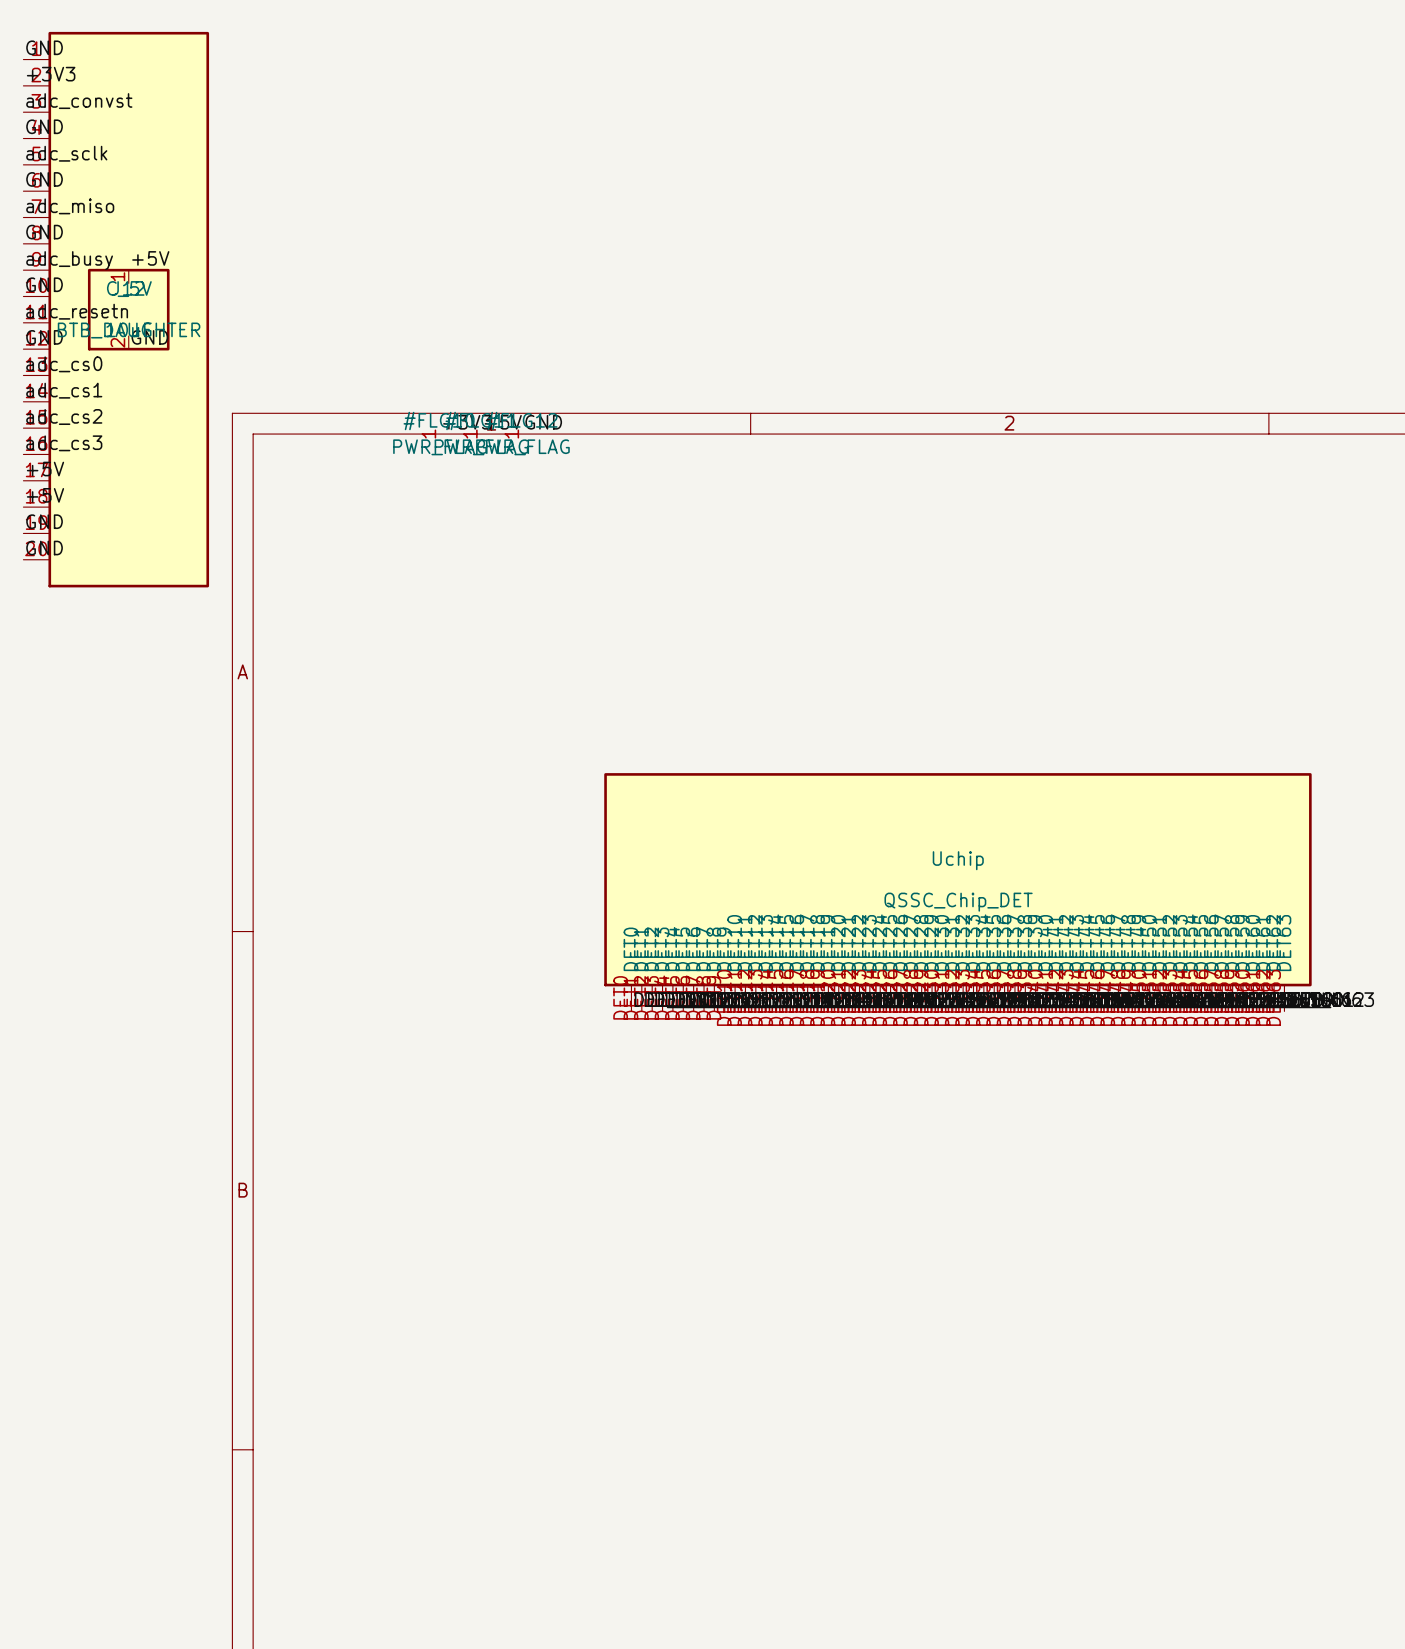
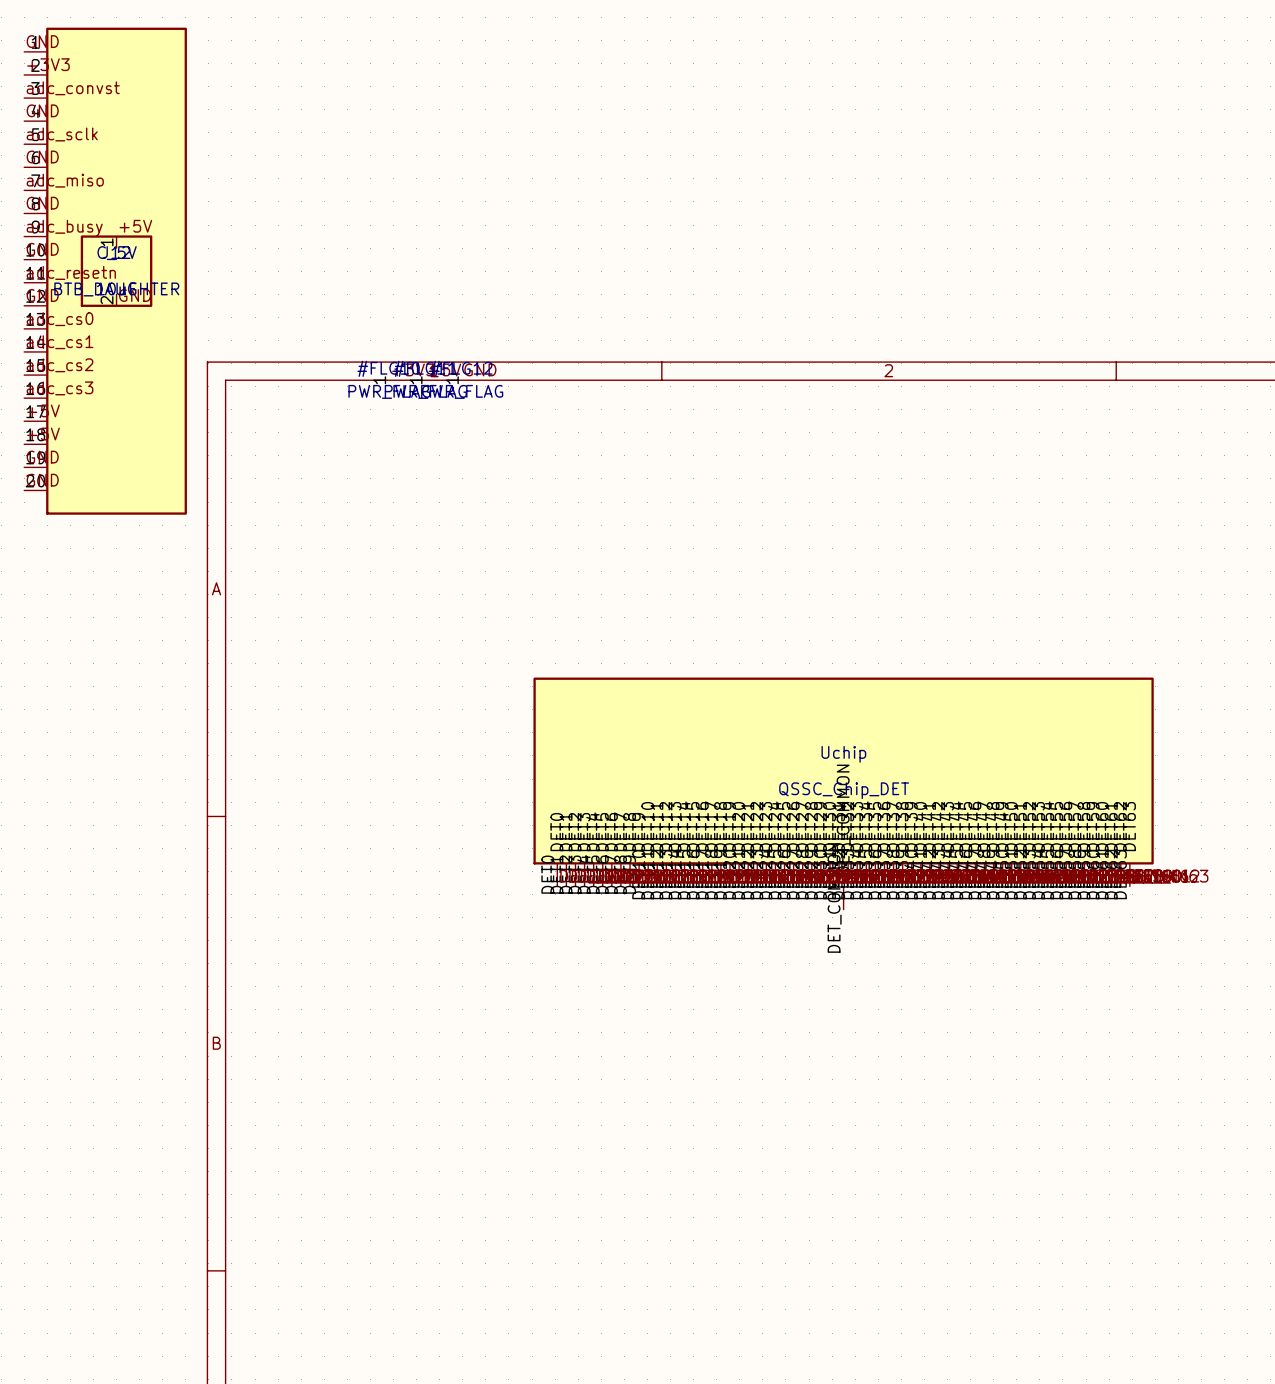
Uchip: QSSC_Chip_DET (957, 892) -> none
Uchip: none -> QSSC_Chip_DET (843, 793)

